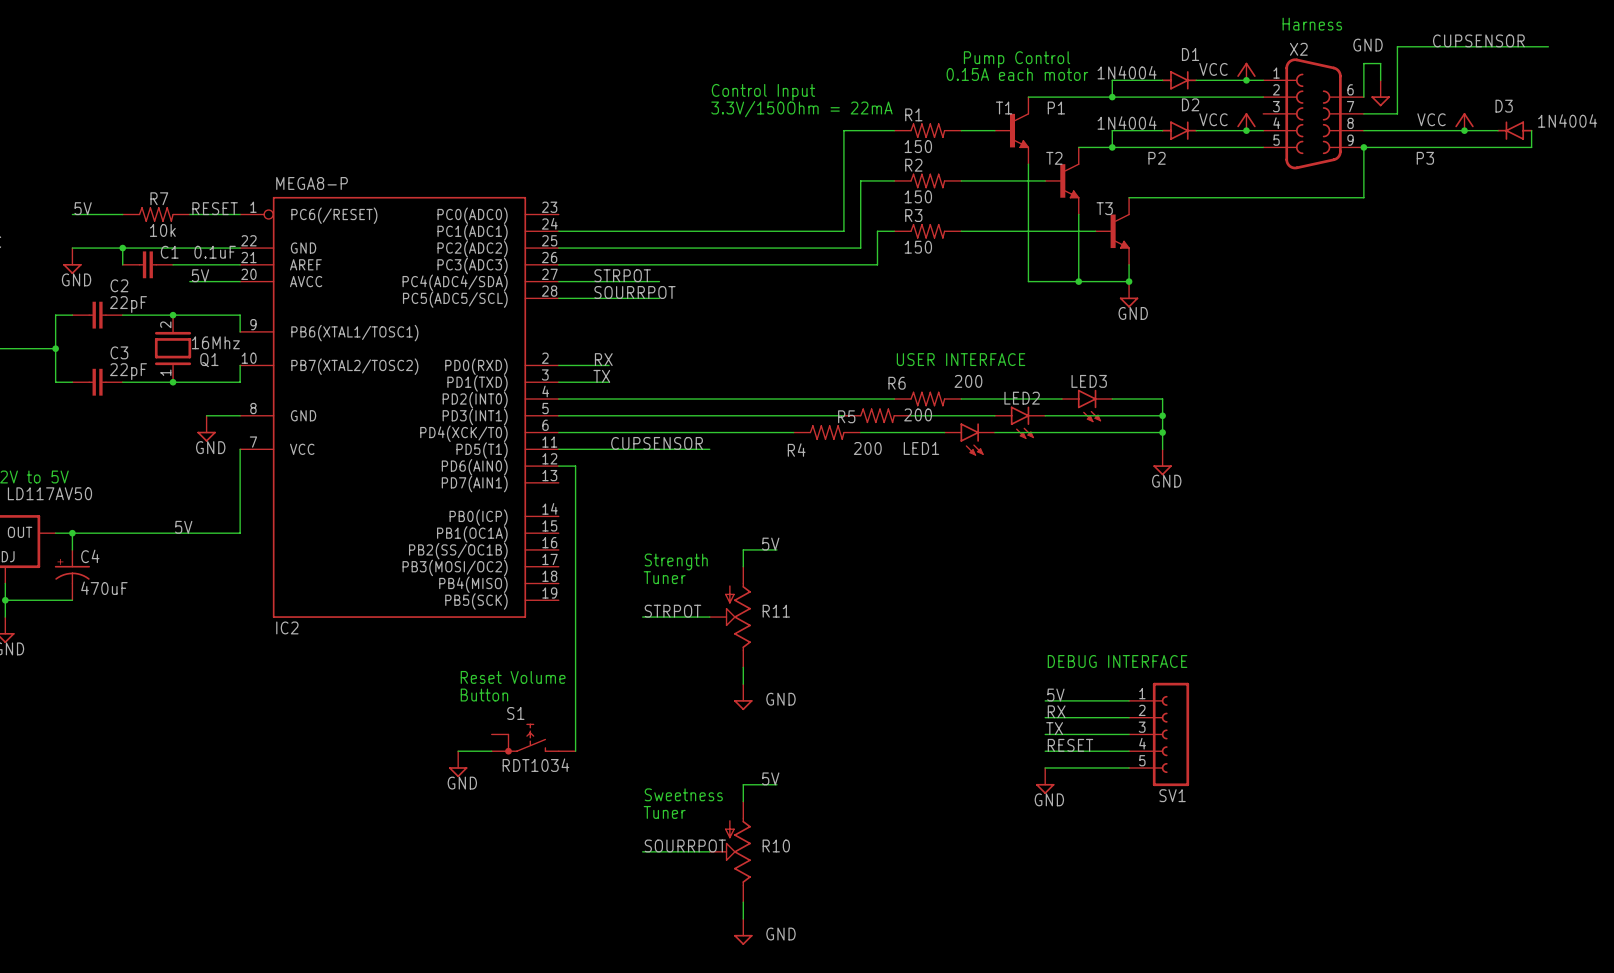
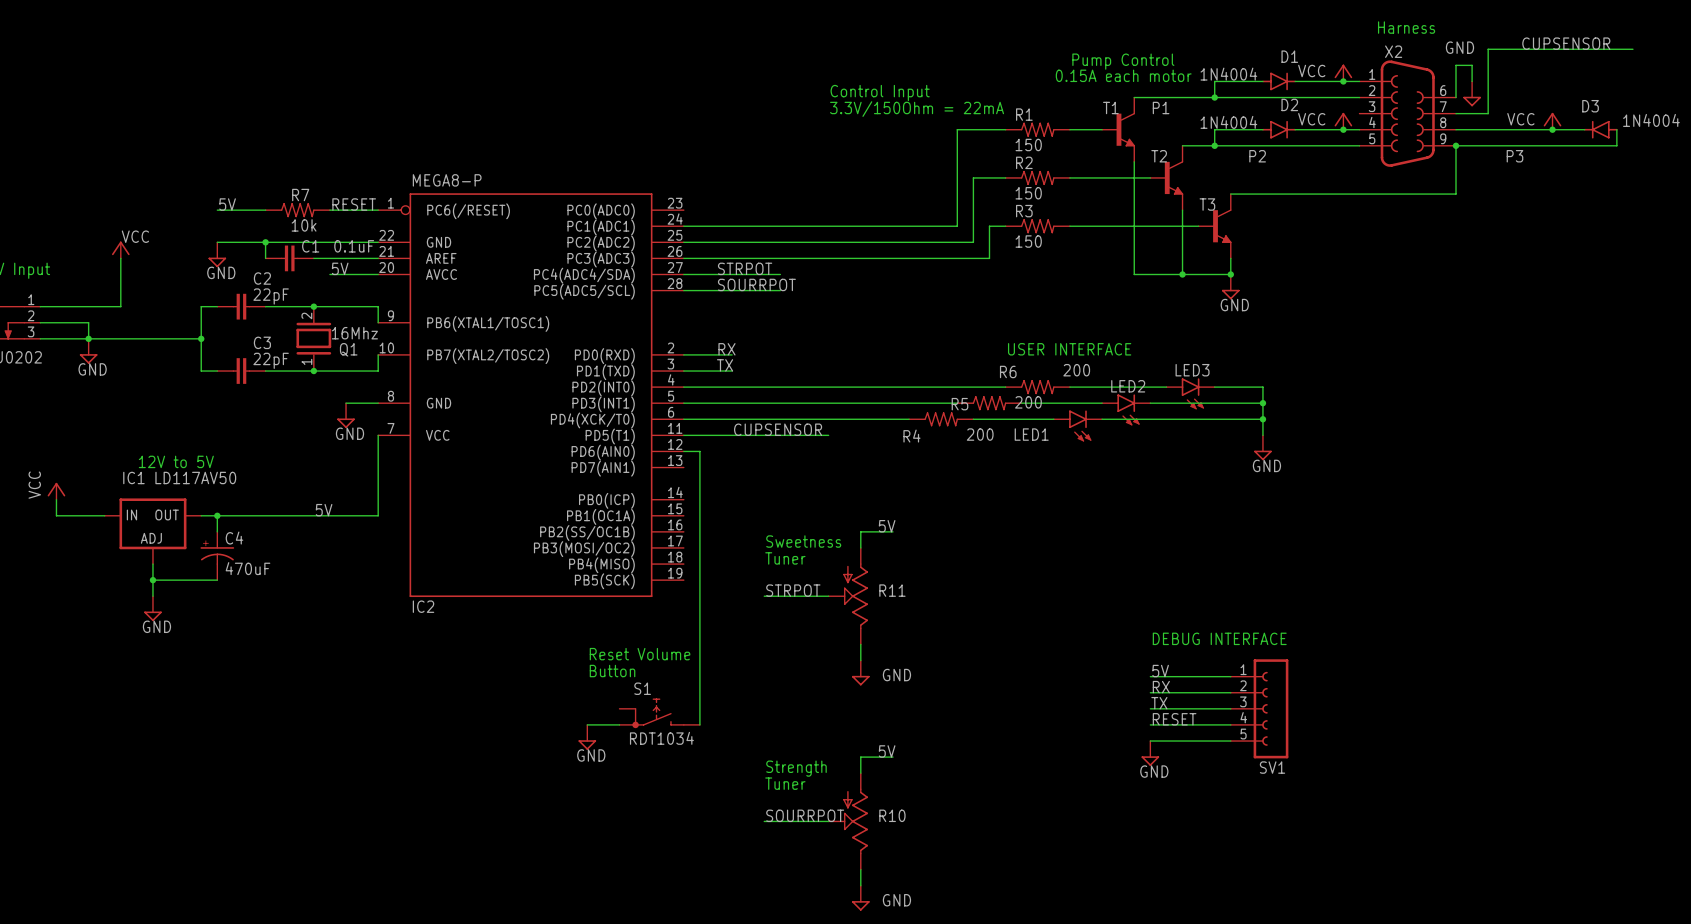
text: Strength (676, 561) -> Sweetness (803, 541)
text: Sweetness (683, 794) -> Strength (796, 768)

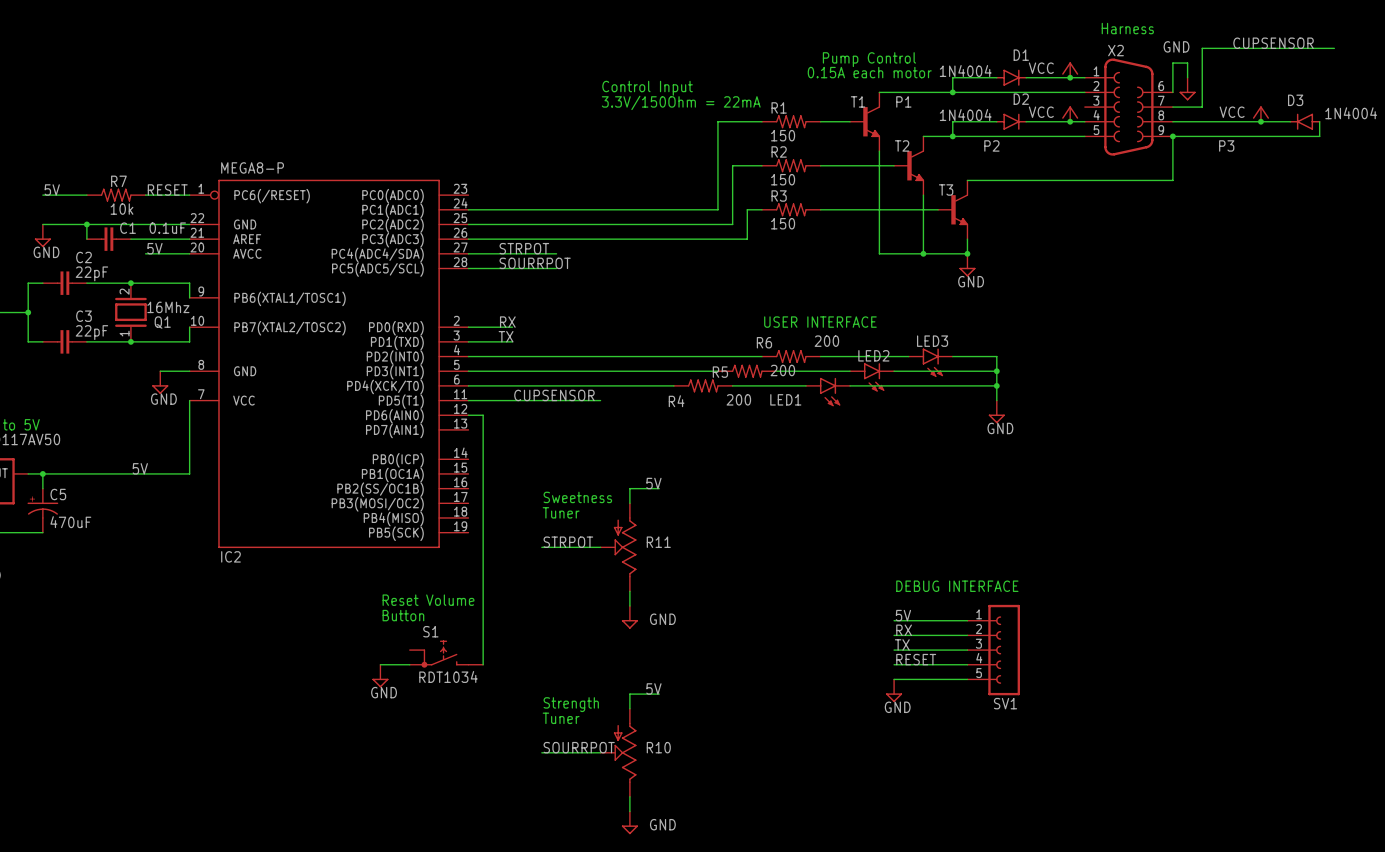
C4 name: C4 (234, 538) -> C5 (58, 494)

